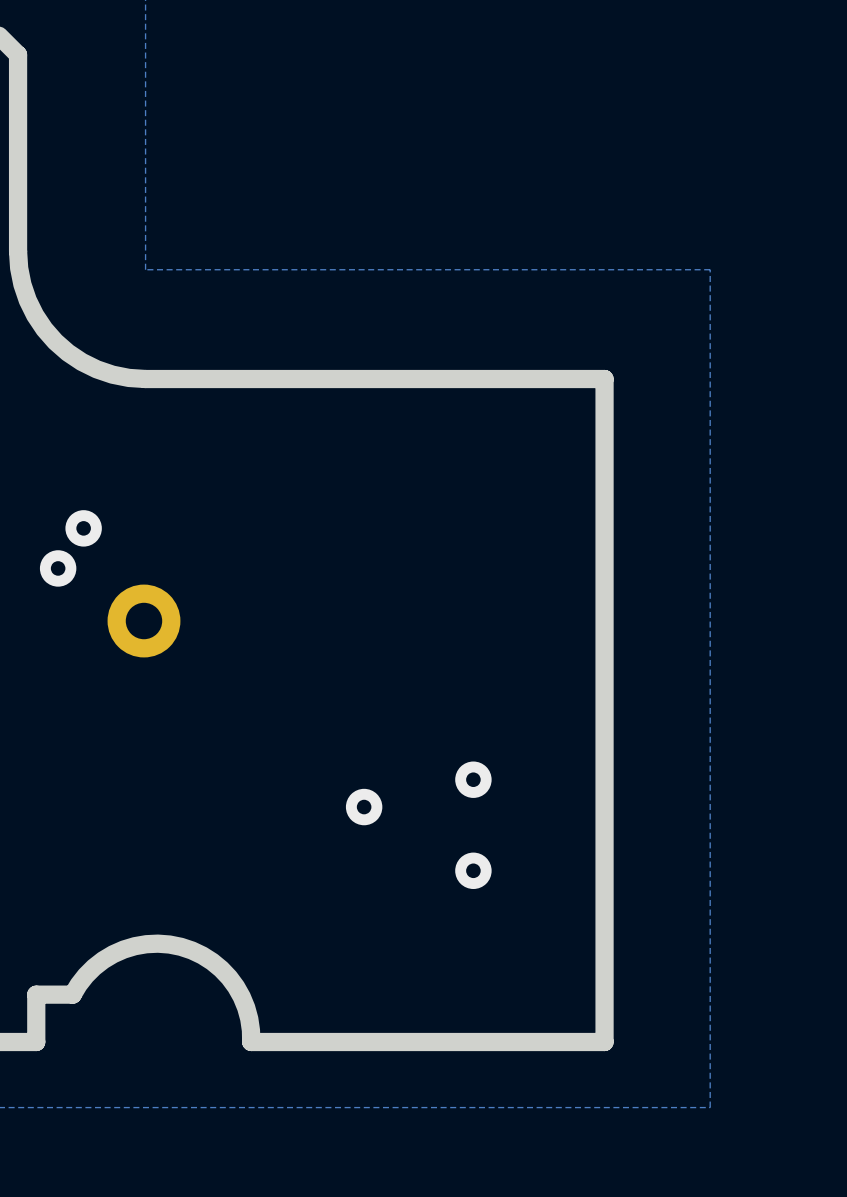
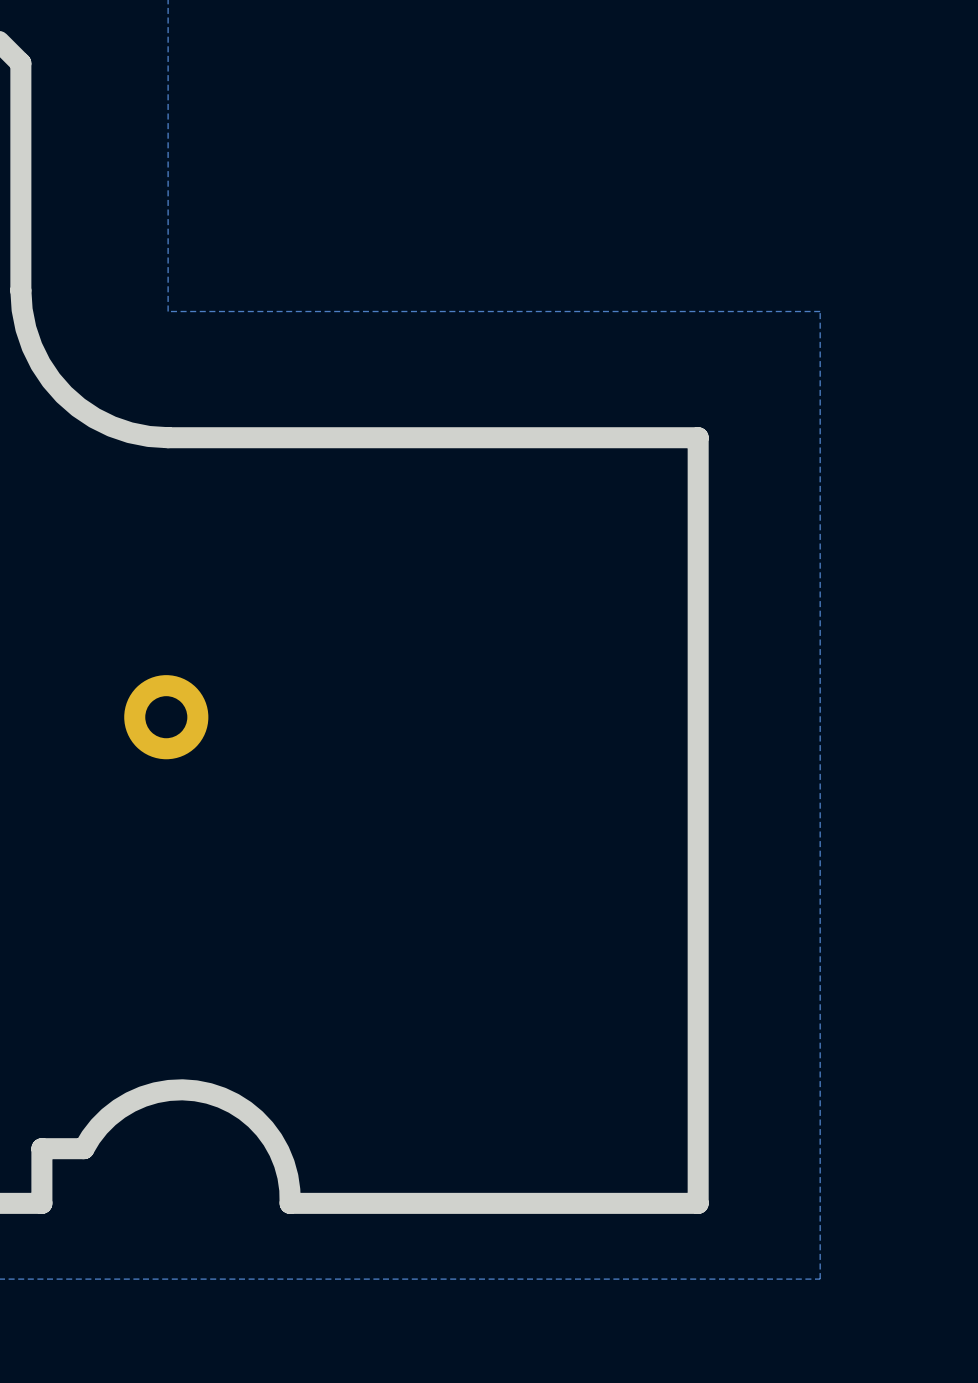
via: (83, 528) -> none
via: (58, 568) -> none
via: (473, 779) -> none
via: (364, 807) -> none
via: (473, 870) -> none

